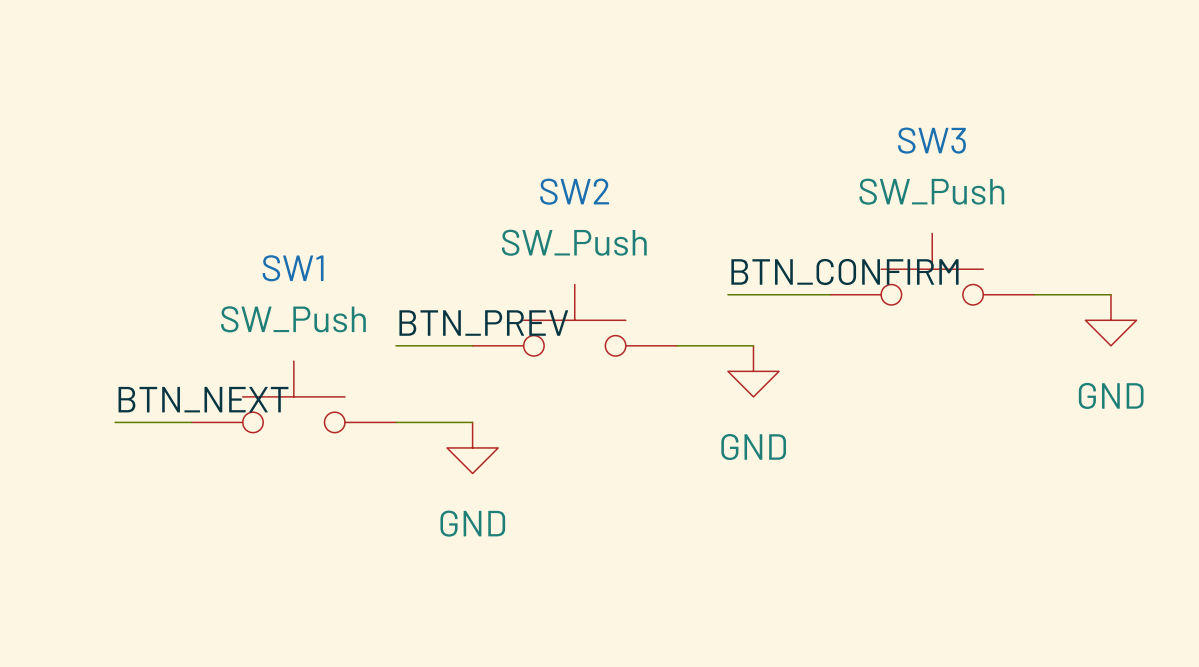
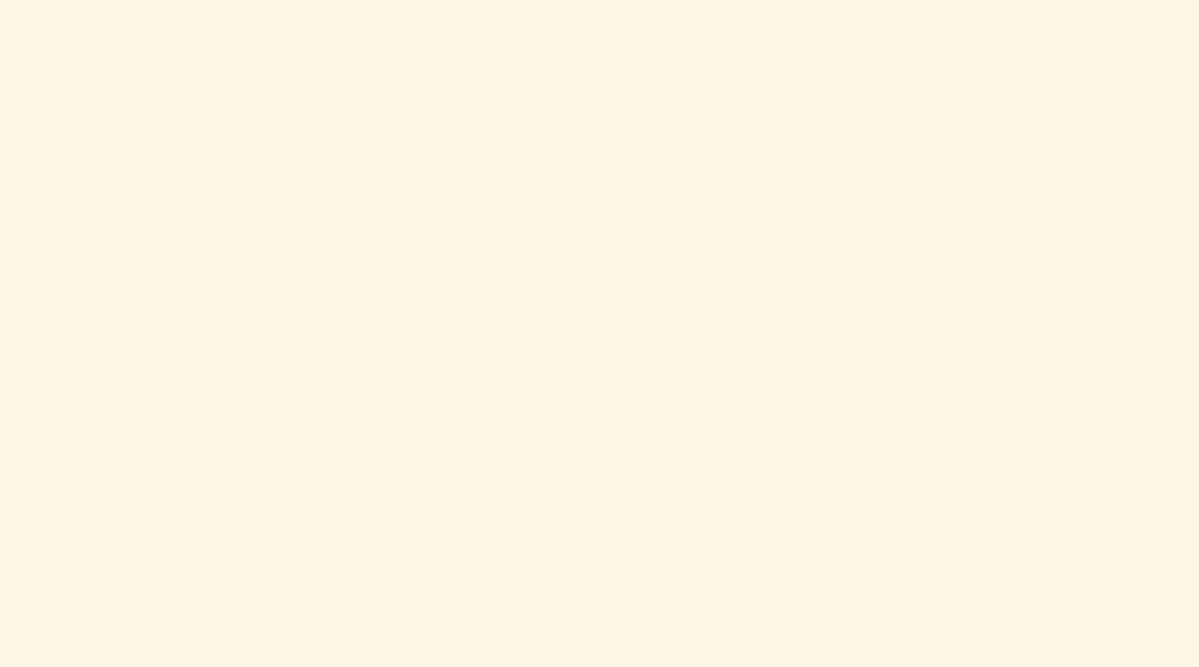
SW3: SW_Push (932, 269) -> none
label: BTN_CONFIRM (844, 271) -> none
wire: (727, 294) (830, 294) -> none
wire: (1034, 294) (1110, 294) -> none
SW2: SW_Push (574, 320) -> none
power symbol: GND (1110, 320) -> none
label: BTN_PREV (483, 323) -> none
wire: (396, 345) (472, 345) -> none
wire: (676, 345) (753, 345) -> none
power symbol: GND (753, 371) -> none
SW1: SW_Push (293, 396) -> none
label: BTN_NEXT (203, 399) -> none
wire: (115, 422) (191, 422) -> none
wire: (396, 422) (472, 422) -> none
power symbol: GND (472, 447) -> none

